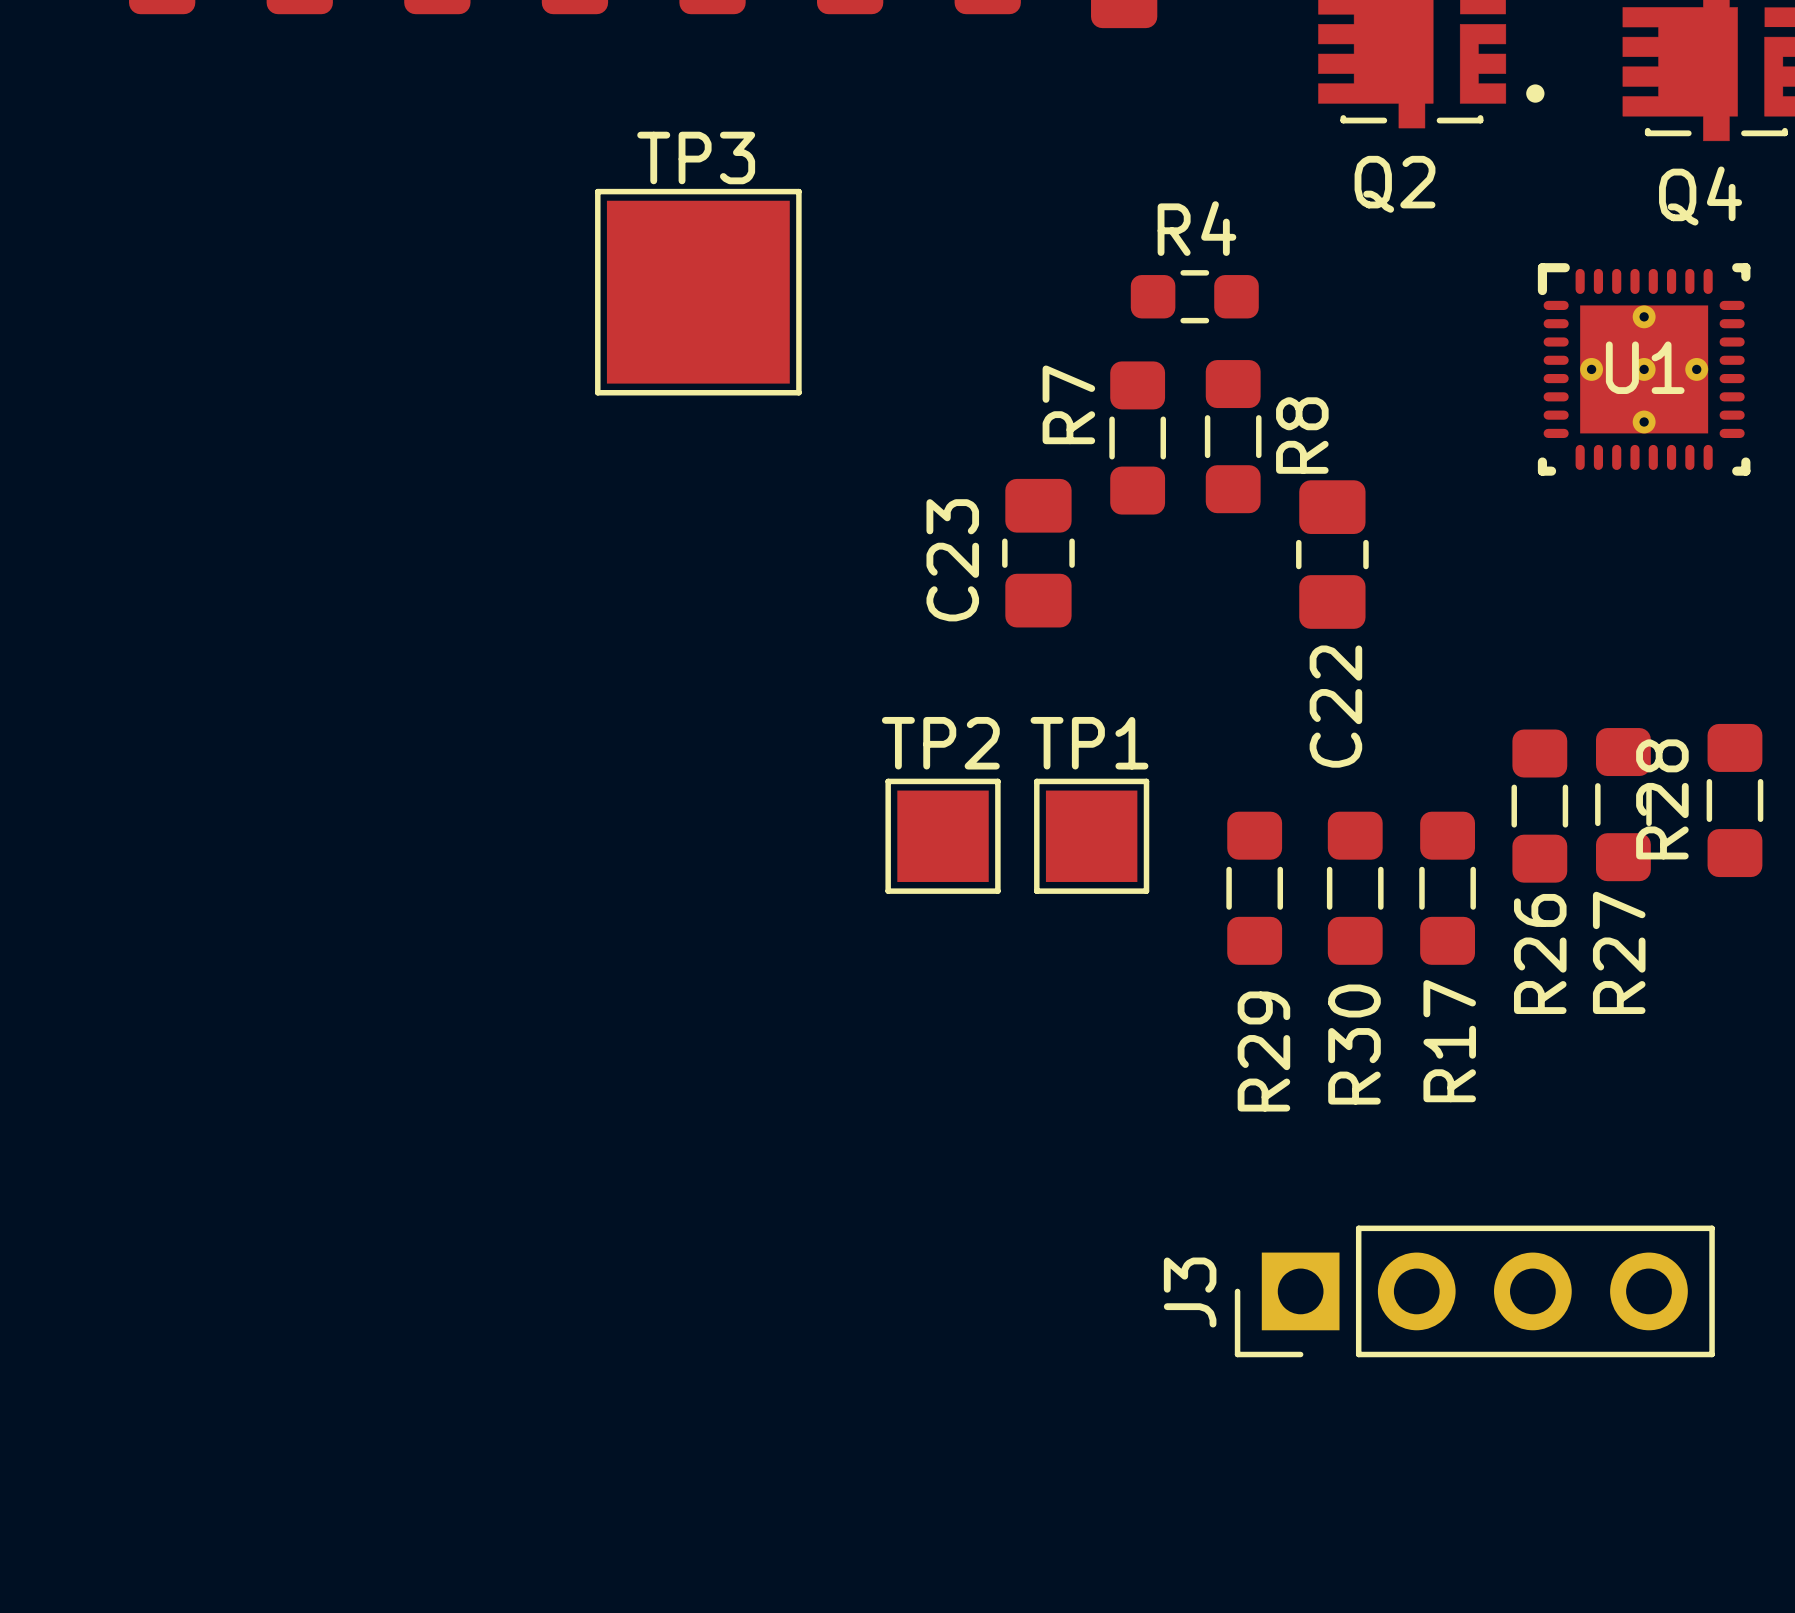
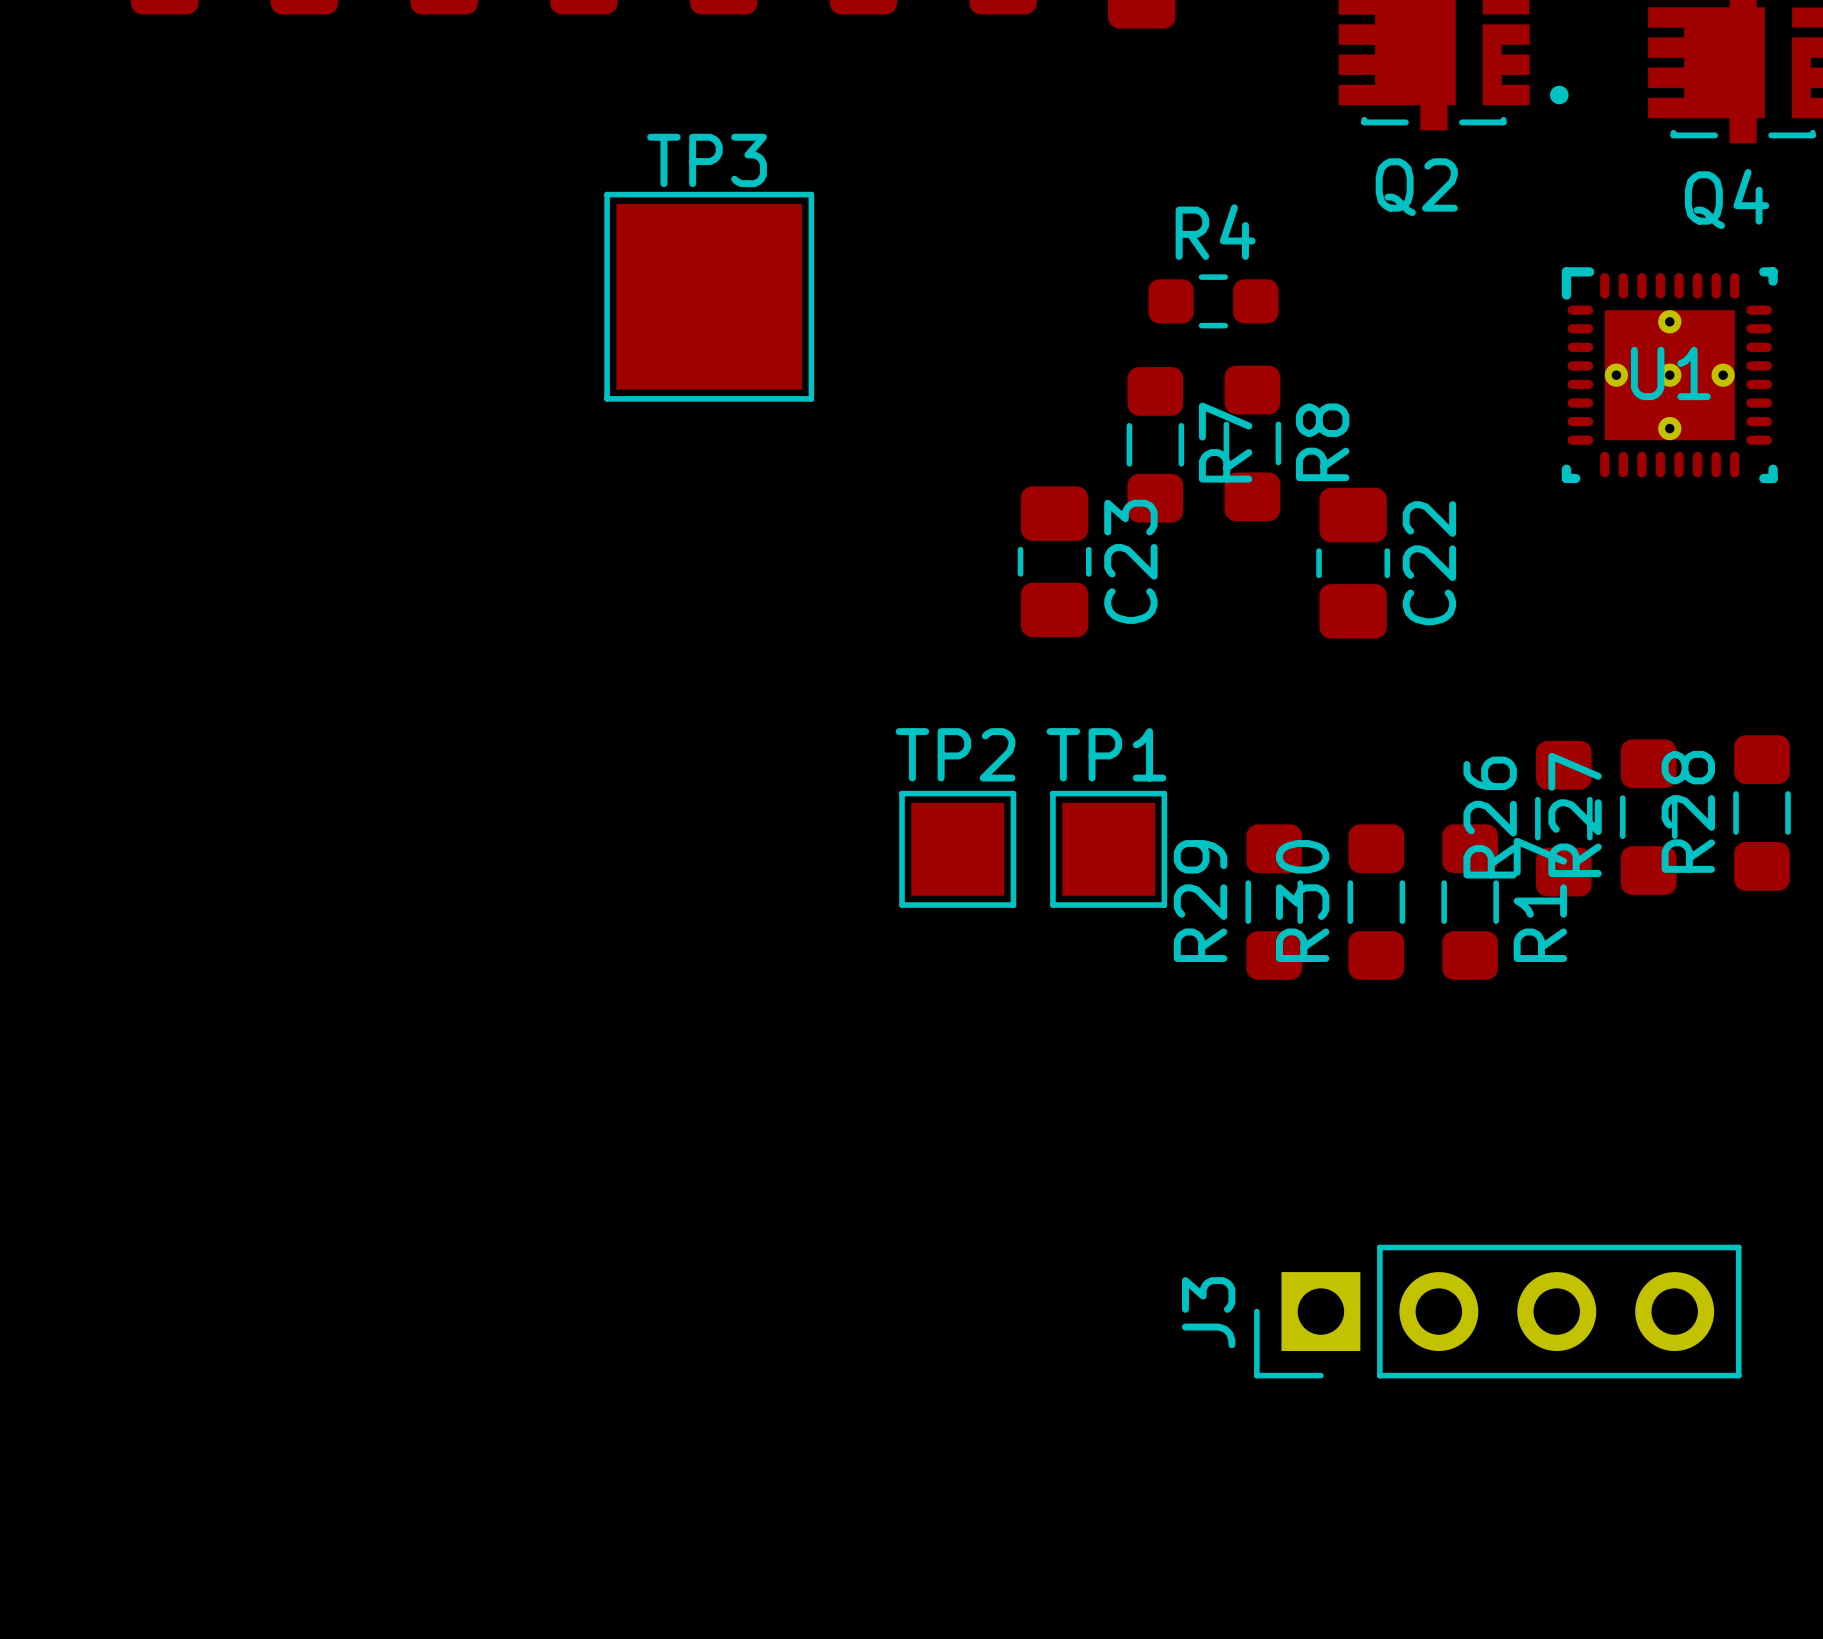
R7 name position: R7 (1068, 404) -> R7 (1225, 442)
C23 name position: C23 (952, 560) -> C23 (1130, 561)
C22 name position: C22 (1335, 706) -> C22 (1429, 563)
R27 name position: R27 (1619, 952) -> R27 (1575, 814)
R26 name position: R26 (1540, 953) -> R26 (1490, 817)
R17 name position: R17 (1449, 1041) -> R17 (1540, 899)
R30 name position: R30 (1354, 1044) -> R30 (1302, 901)
R29 name position: R29 (1263, 1051) -> R29 (1200, 901)

